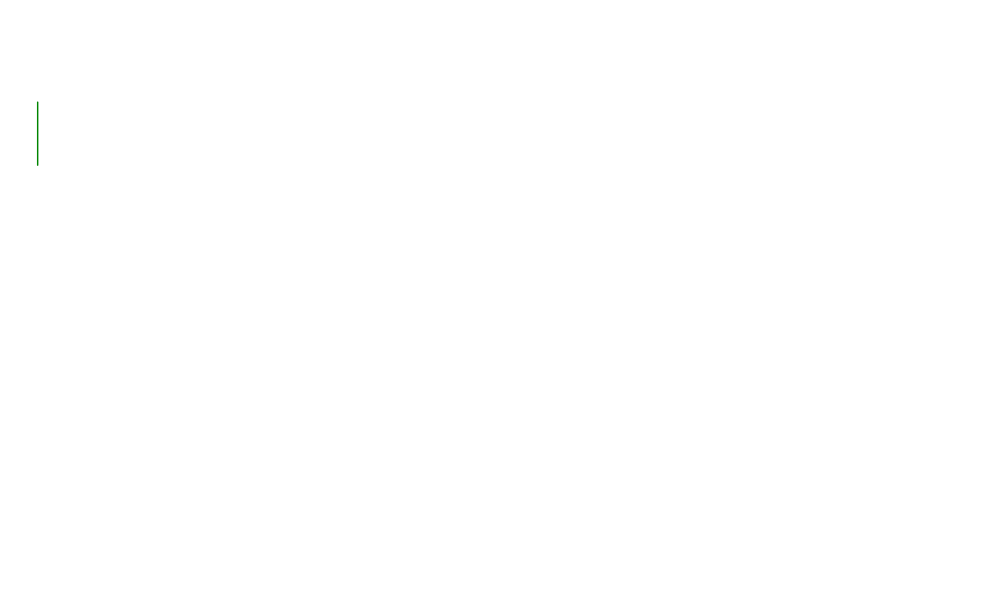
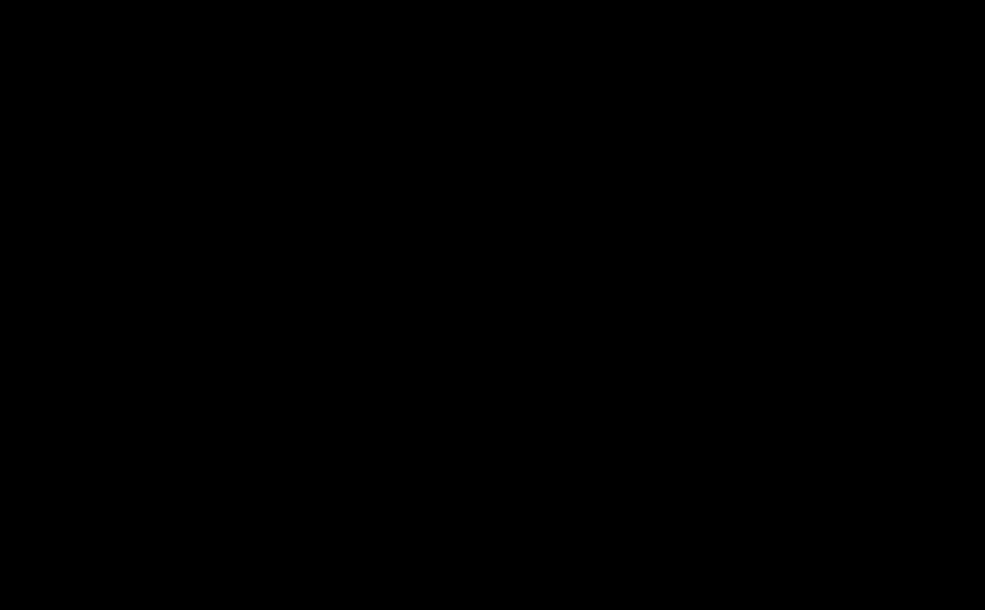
wire: (37, 102) (37, 165) -> none

